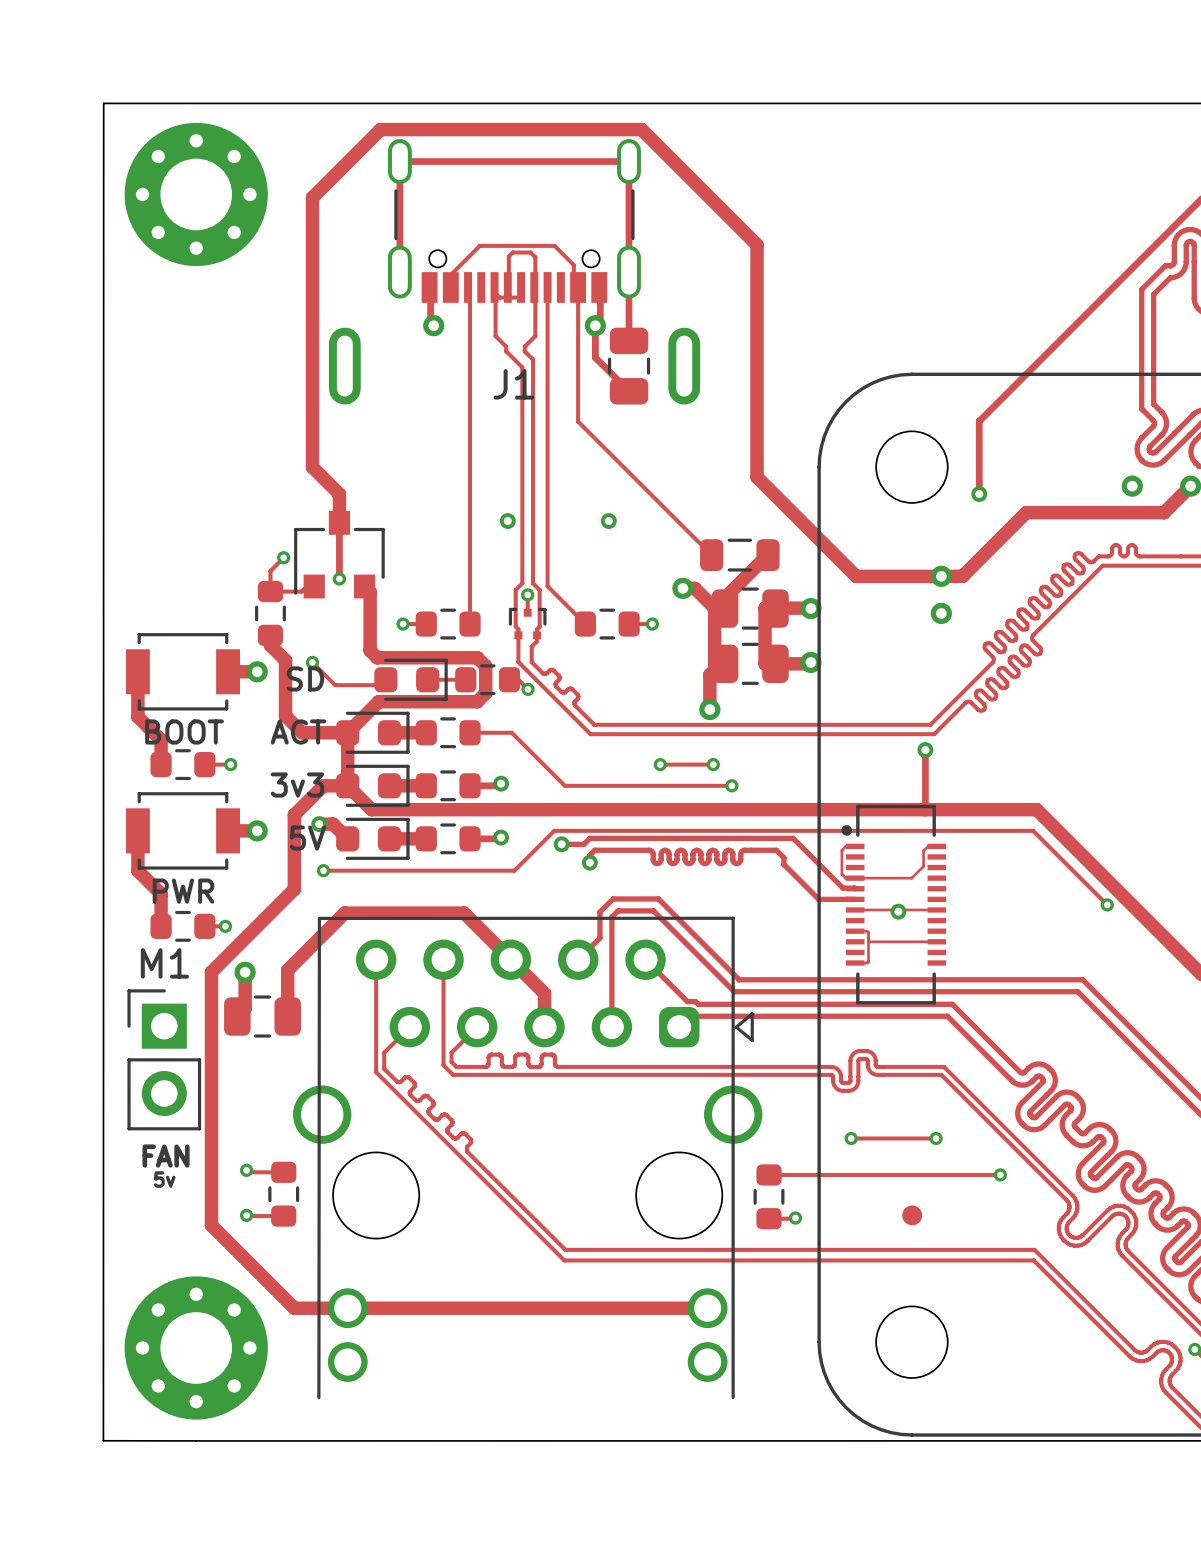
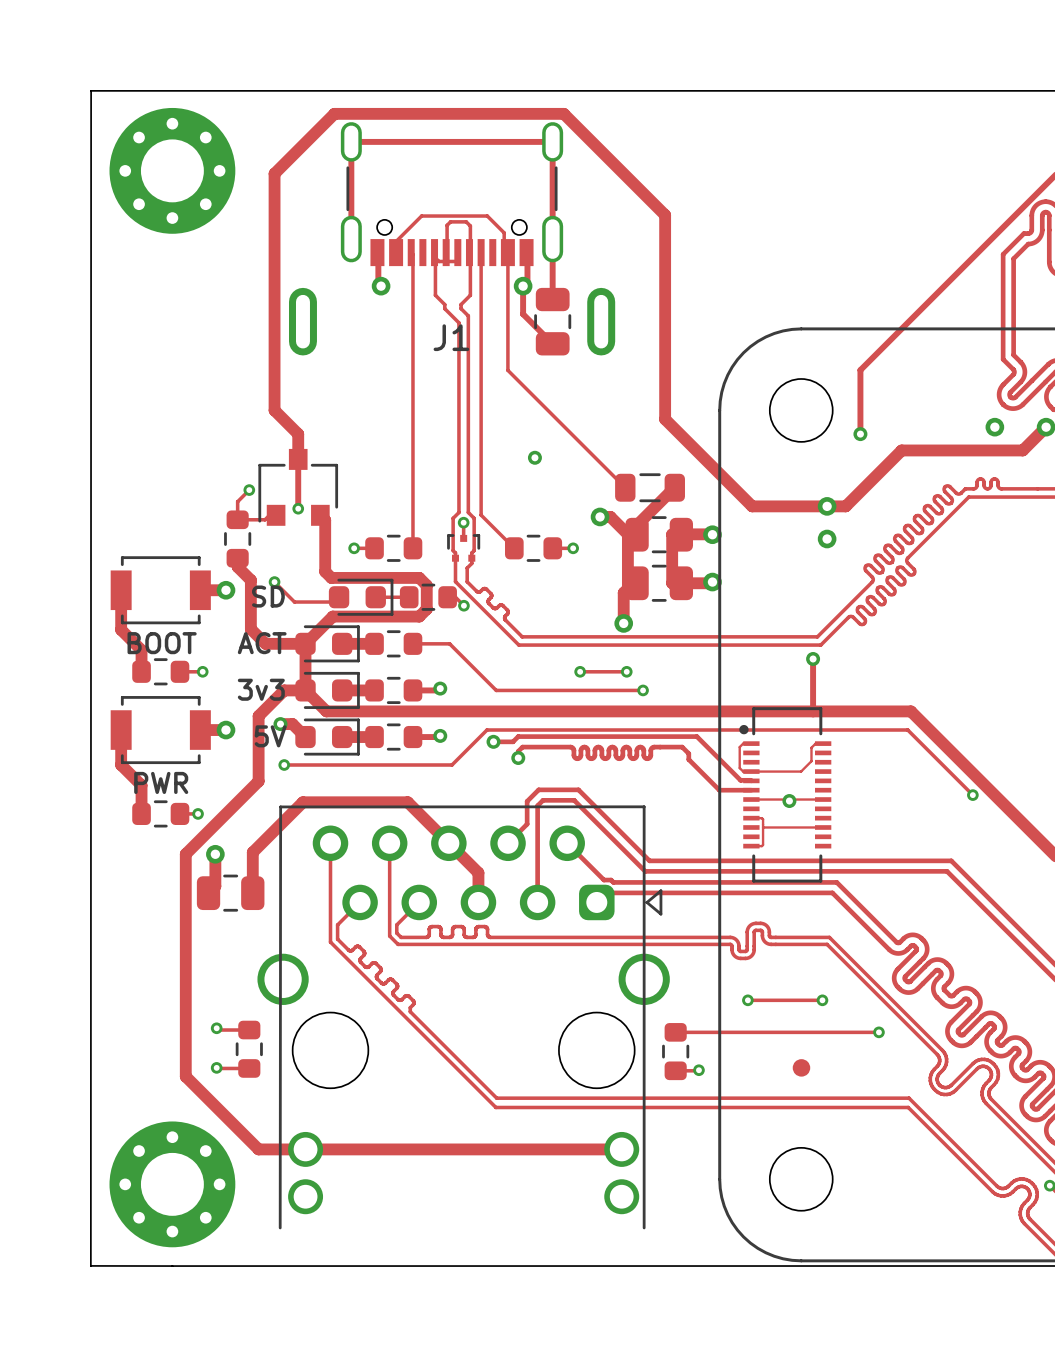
via: (507, 521) -> none
M1: (164, 1059) -> none
text: FAN (166, 1156) -> none
text: 5v (164, 1179) -> none

